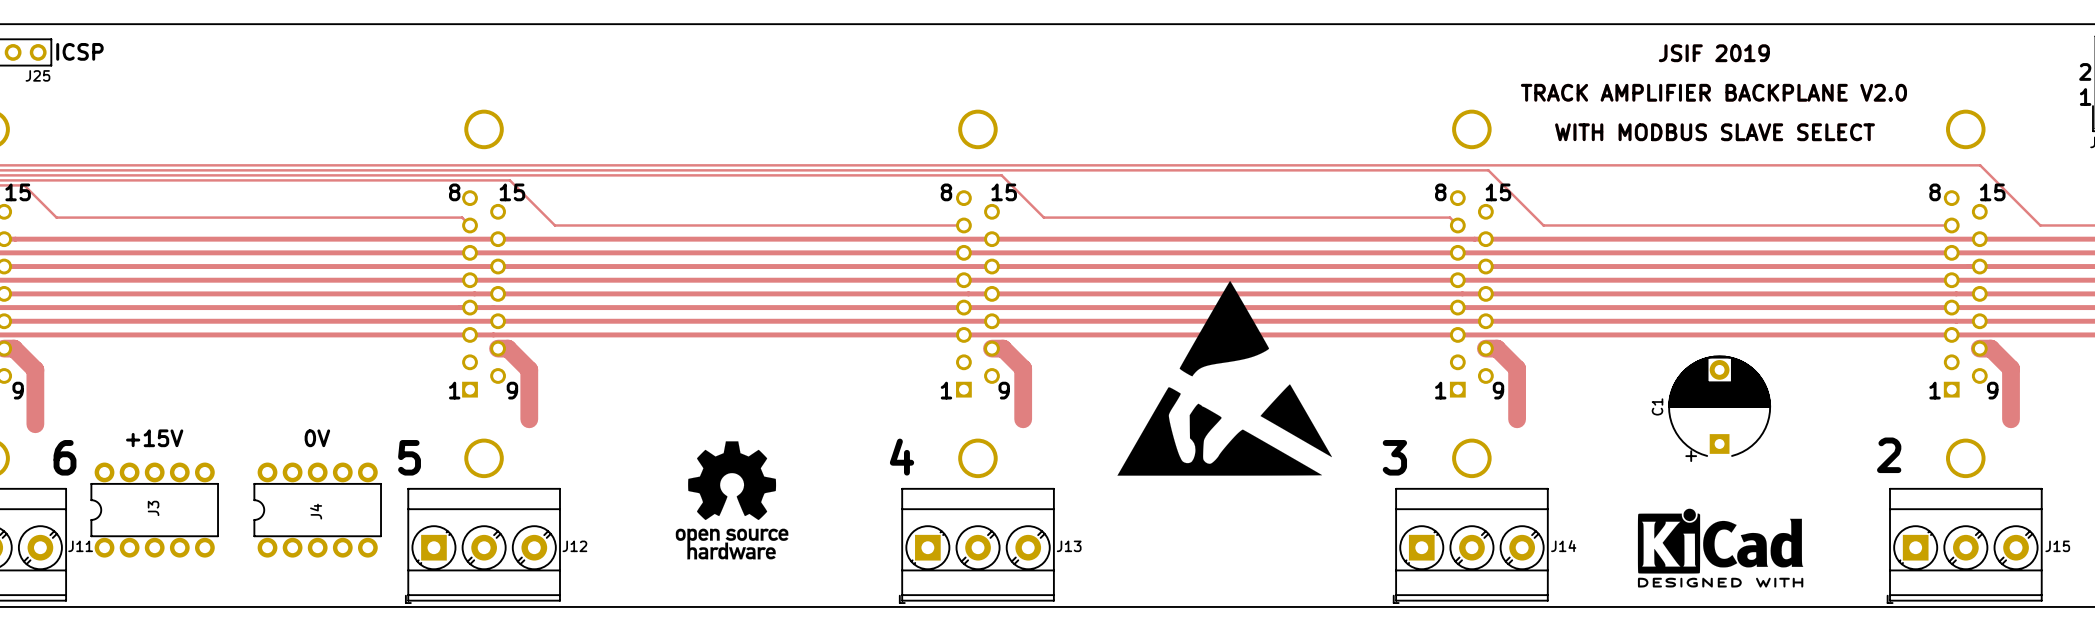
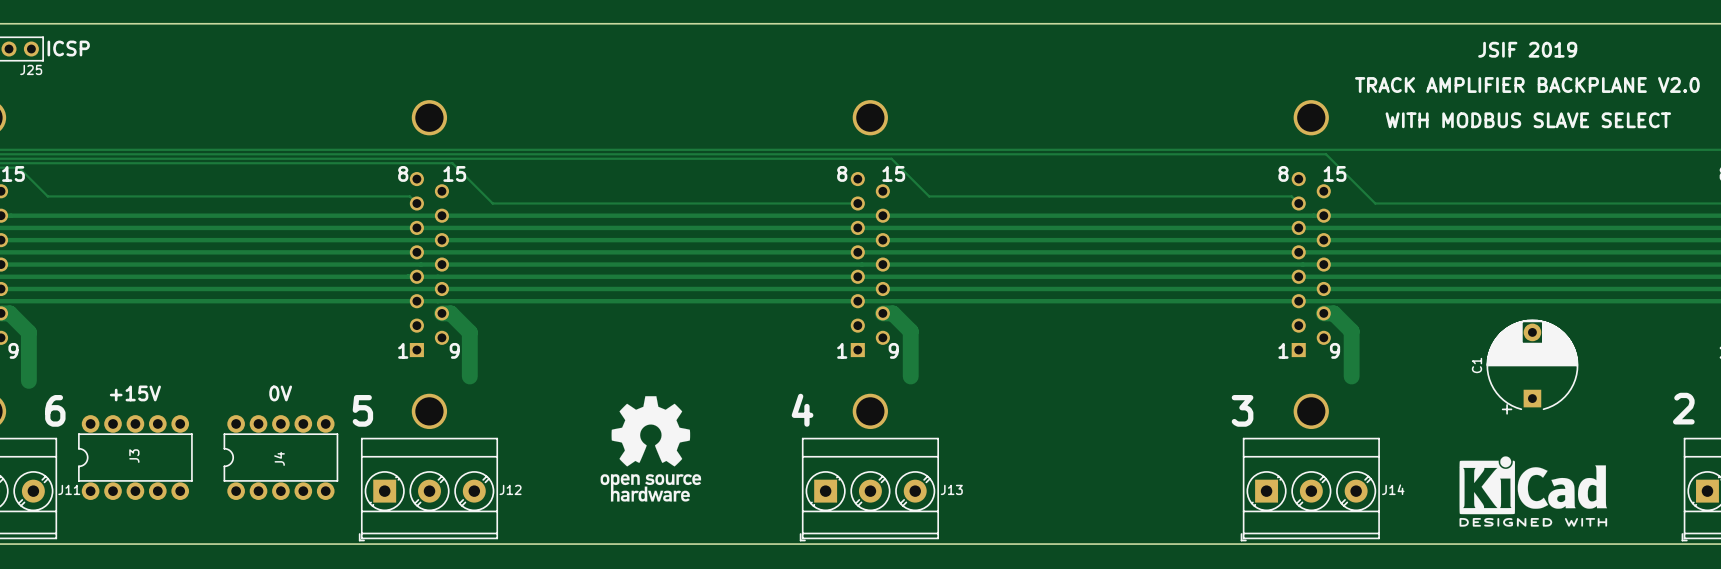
drawing: [1117, 280, 1332, 476] -> none

